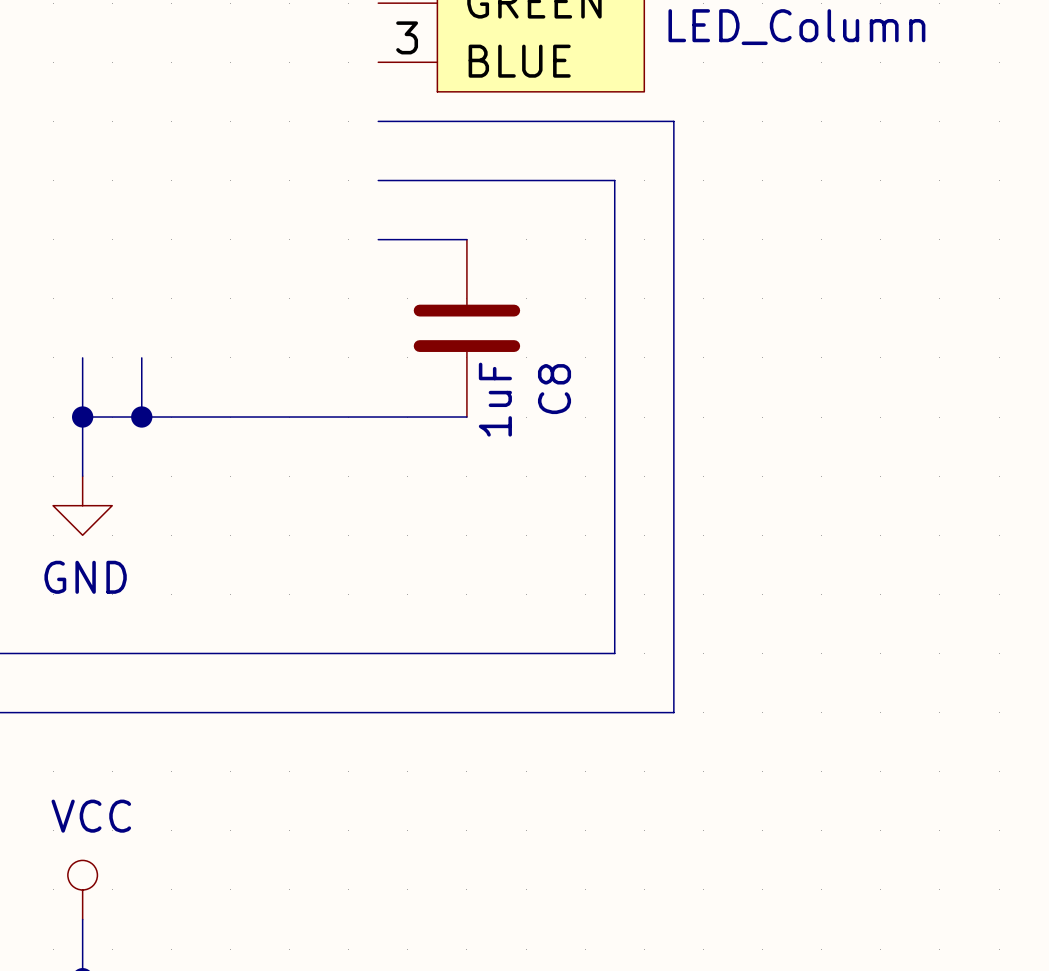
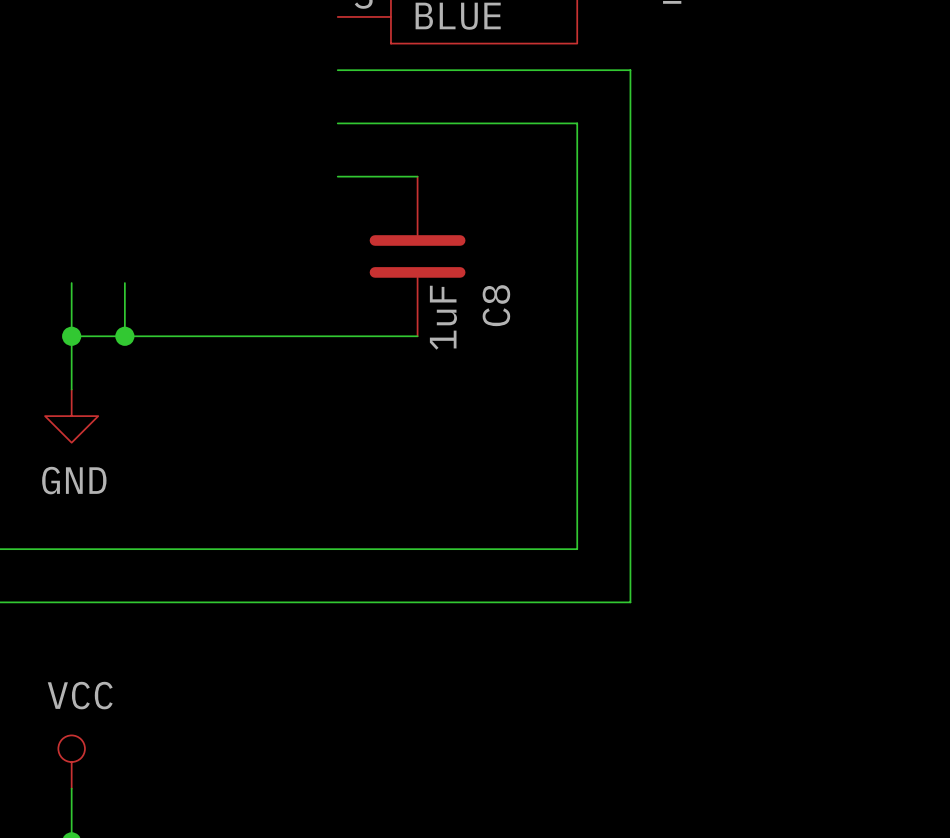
wire: (673, 121) (673, 712) -> (603, 70) (630, 70) (630, 602) (603, 602)
wire: (614, 180) (614, 653) -> (550, 123) (577, 123) (577, 549) (550, 549)

